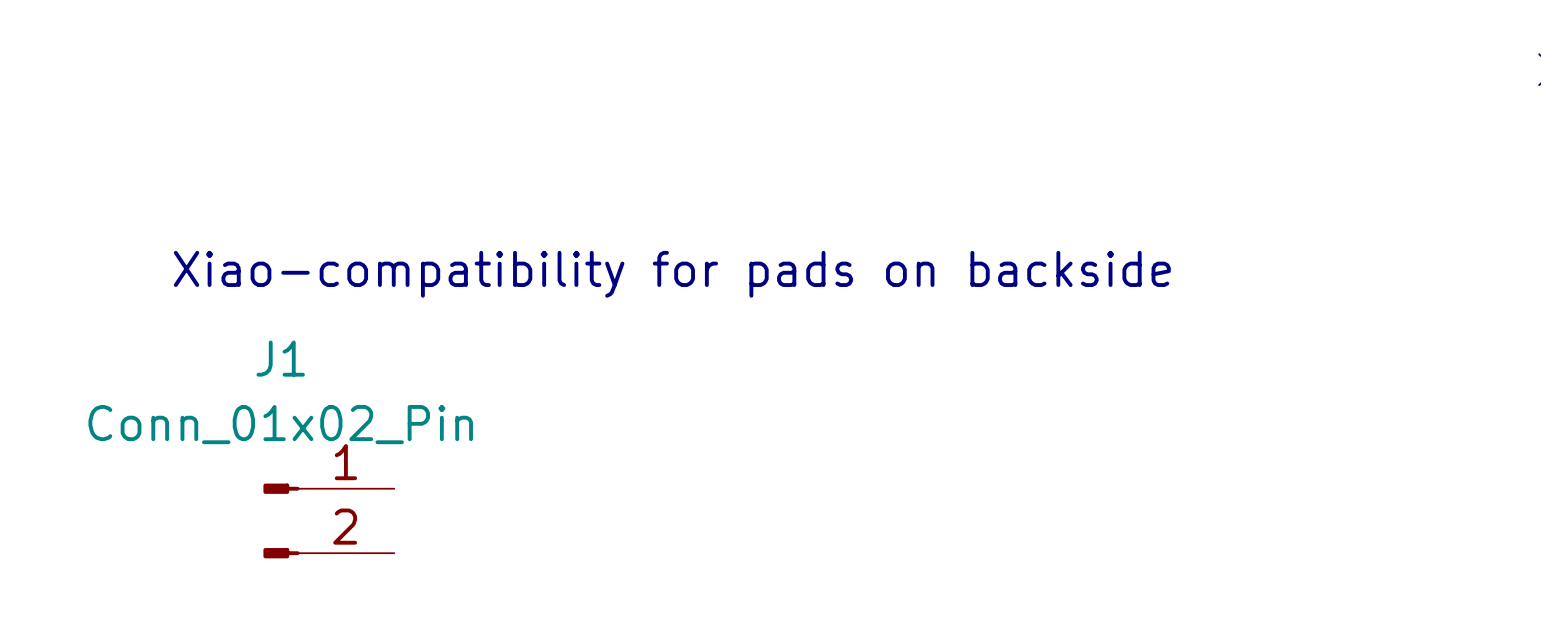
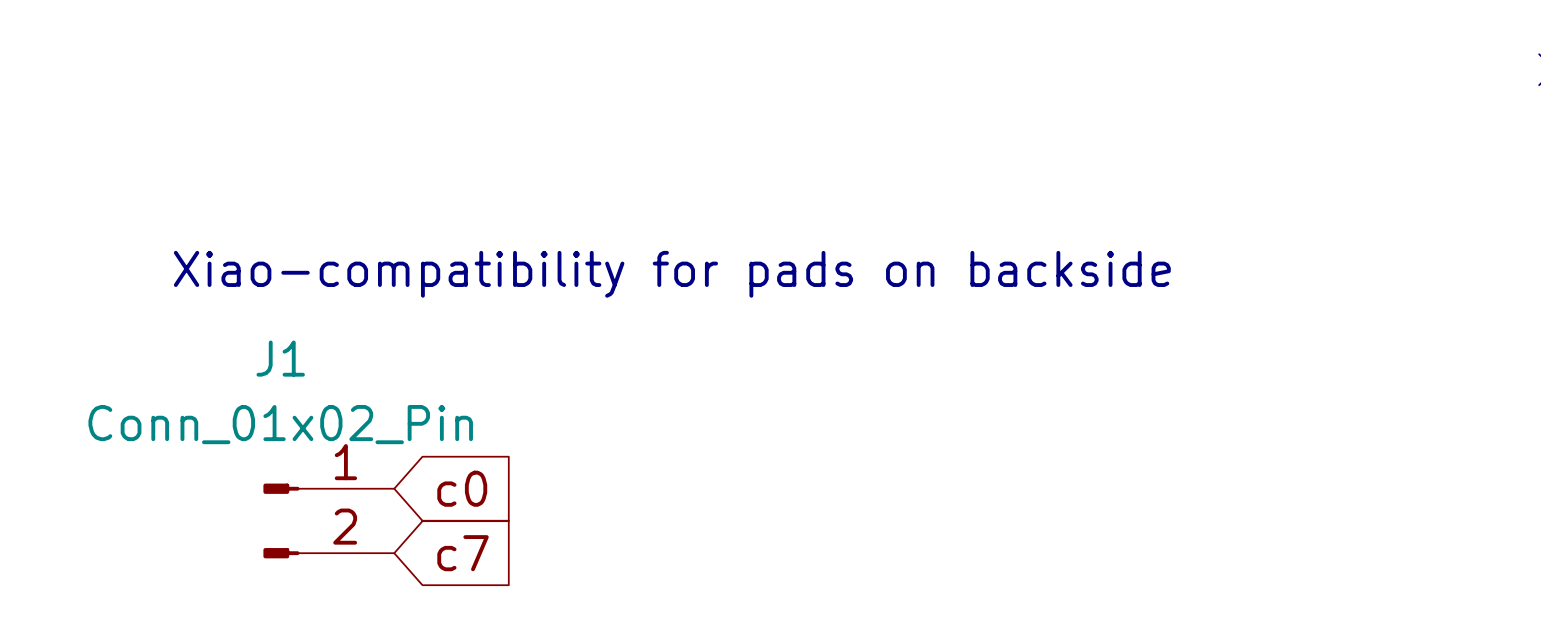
global label: none -> c0 (462, 488)
global label: none -> c7 (463, 553)

